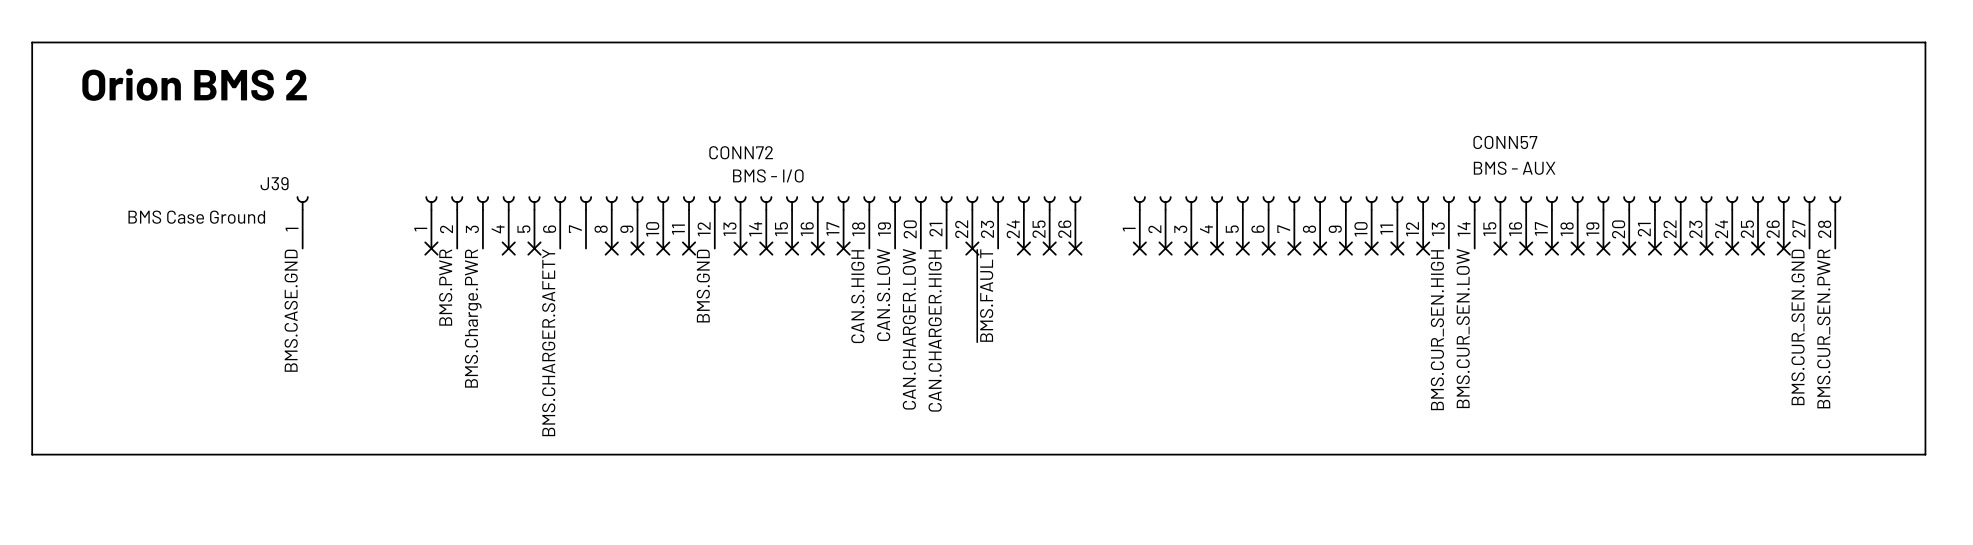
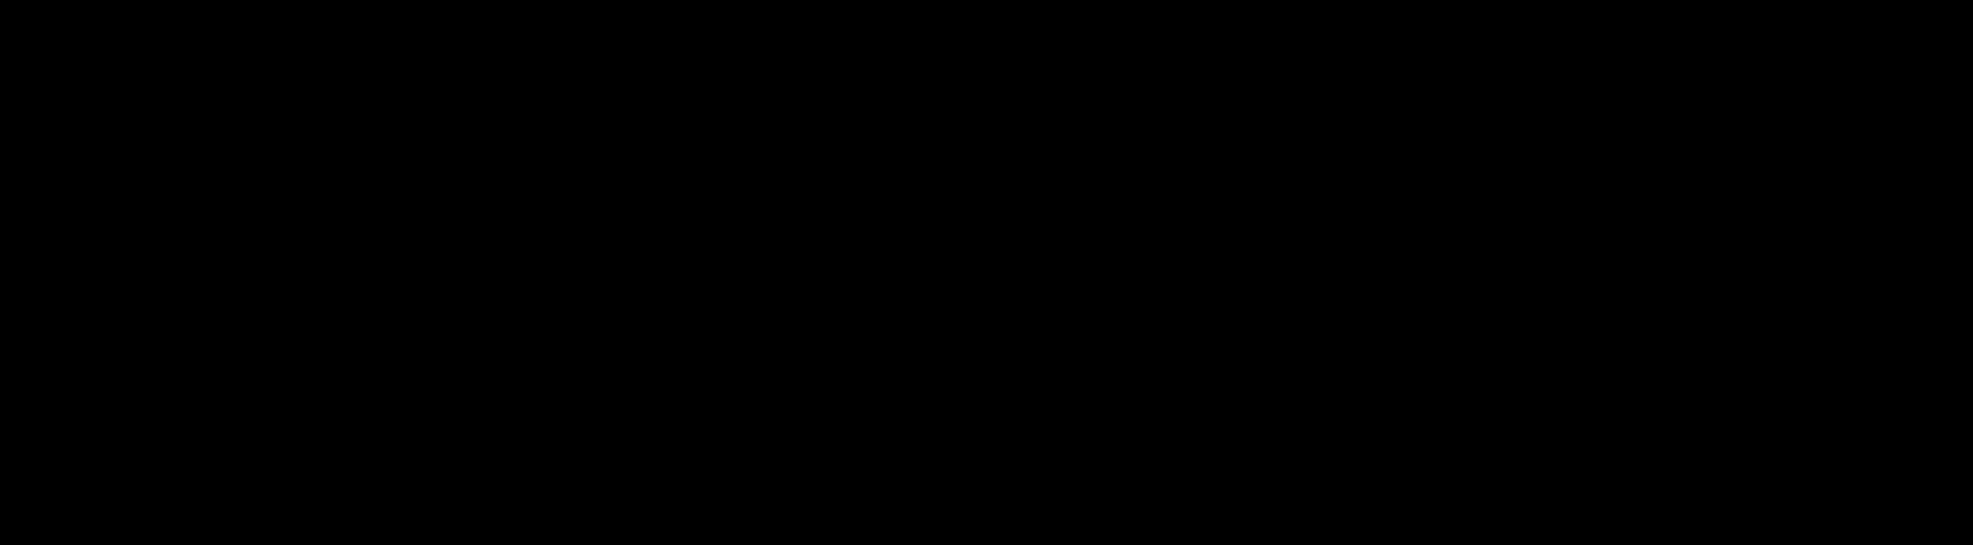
line: (32, 42) (1925, 42) (1925, 454) (32, 454) (32, 42) -> none
text: Orion BMS 2 (194, 84) -> none
J39: BMS Case Ground (302, 222) -> none
CONN72: BMS - I/O (753, 222) -> none
CONN57: BMS - AUX (1487, 222) -> none
no-connect mark: (431, 248) -> none
no-connect mark: (508, 248) -> none
no-connect mark: (534, 248) -> none
no-connect mark: (611, 248) -> none
no-connect mark: (637, 248) -> none
no-connect mark: (663, 248) -> none
no-connect mark: (689, 248) -> none
no-connect mark: (740, 248) -> none
no-connect mark: (766, 248) -> none
no-connect mark: (792, 248) -> none
no-connect mark: (817, 248) -> none
no-connect mark: (843, 248) -> none
no-connect mark: (972, 248) -> none
no-connect mark: (1023, 248) -> none
no-connect mark: (1049, 248) -> none
no-connect mark: (1075, 248) -> none
no-connect mark: (1139, 248) -> none
no-connect mark: (1165, 248) -> none
no-connect mark: (1191, 248) -> none
no-connect mark: (1217, 248) -> none
no-connect mark: (1242, 248) -> none
no-connect mark: (1268, 248) -> none
no-connect mark: (1294, 248) -> none
no-connect mark: (1320, 248) -> none
no-connect mark: (1345, 248) -> none
no-connect mark: (1371, 248) -> none
no-connect mark: (1397, 248) -> none
no-connect mark: (1423, 248) -> none
no-connect mark: (1500, 248) -> none
no-connect mark: (1526, 248) -> none
no-connect mark: (1551, 248) -> none
no-connect mark: (1577, 248) -> none
no-connect mark: (1603, 248) -> none
no-connect mark: (1629, 248) -> none
no-connect mark: (1654, 248) -> none
no-connect mark: (1680, 248) -> none
no-connect mark: (1706, 248) -> none
no-connect mark: (1732, 248) -> none
no-connect mark: (1758, 248) -> none
no-connect mark: (1783, 248) -> none
label: BMS.GND (703, 286) -> none
label: BMS.PWR (445, 287) -> none
label: CAN.S.LOW (883, 295) -> none
label: ~{BMS.FAULT} (985, 295) -> none
label: CAN.S.HIGH (857, 296) -> none
label: BMS.CASE.GND (291, 310) -> none
label: BMS.Charge.PWR (473, 318) -> none
label: BMS.CUR_SEN.GND (1798, 327) -> none
label: BMS.CUR_SEN.LOW (1463, 328) -> none
label: BMS.CUR_SEN.PWR (1823, 328) -> none
label: CAN.CHARGER.LOW (909, 329) -> none
label: CAN.CHARGER.HIGH (935, 330) -> none
label: BMS.CUR_SEN.HIGH (1437, 330) -> none
label: BMS.CHARGER.SAFETY (548, 342) -> none

